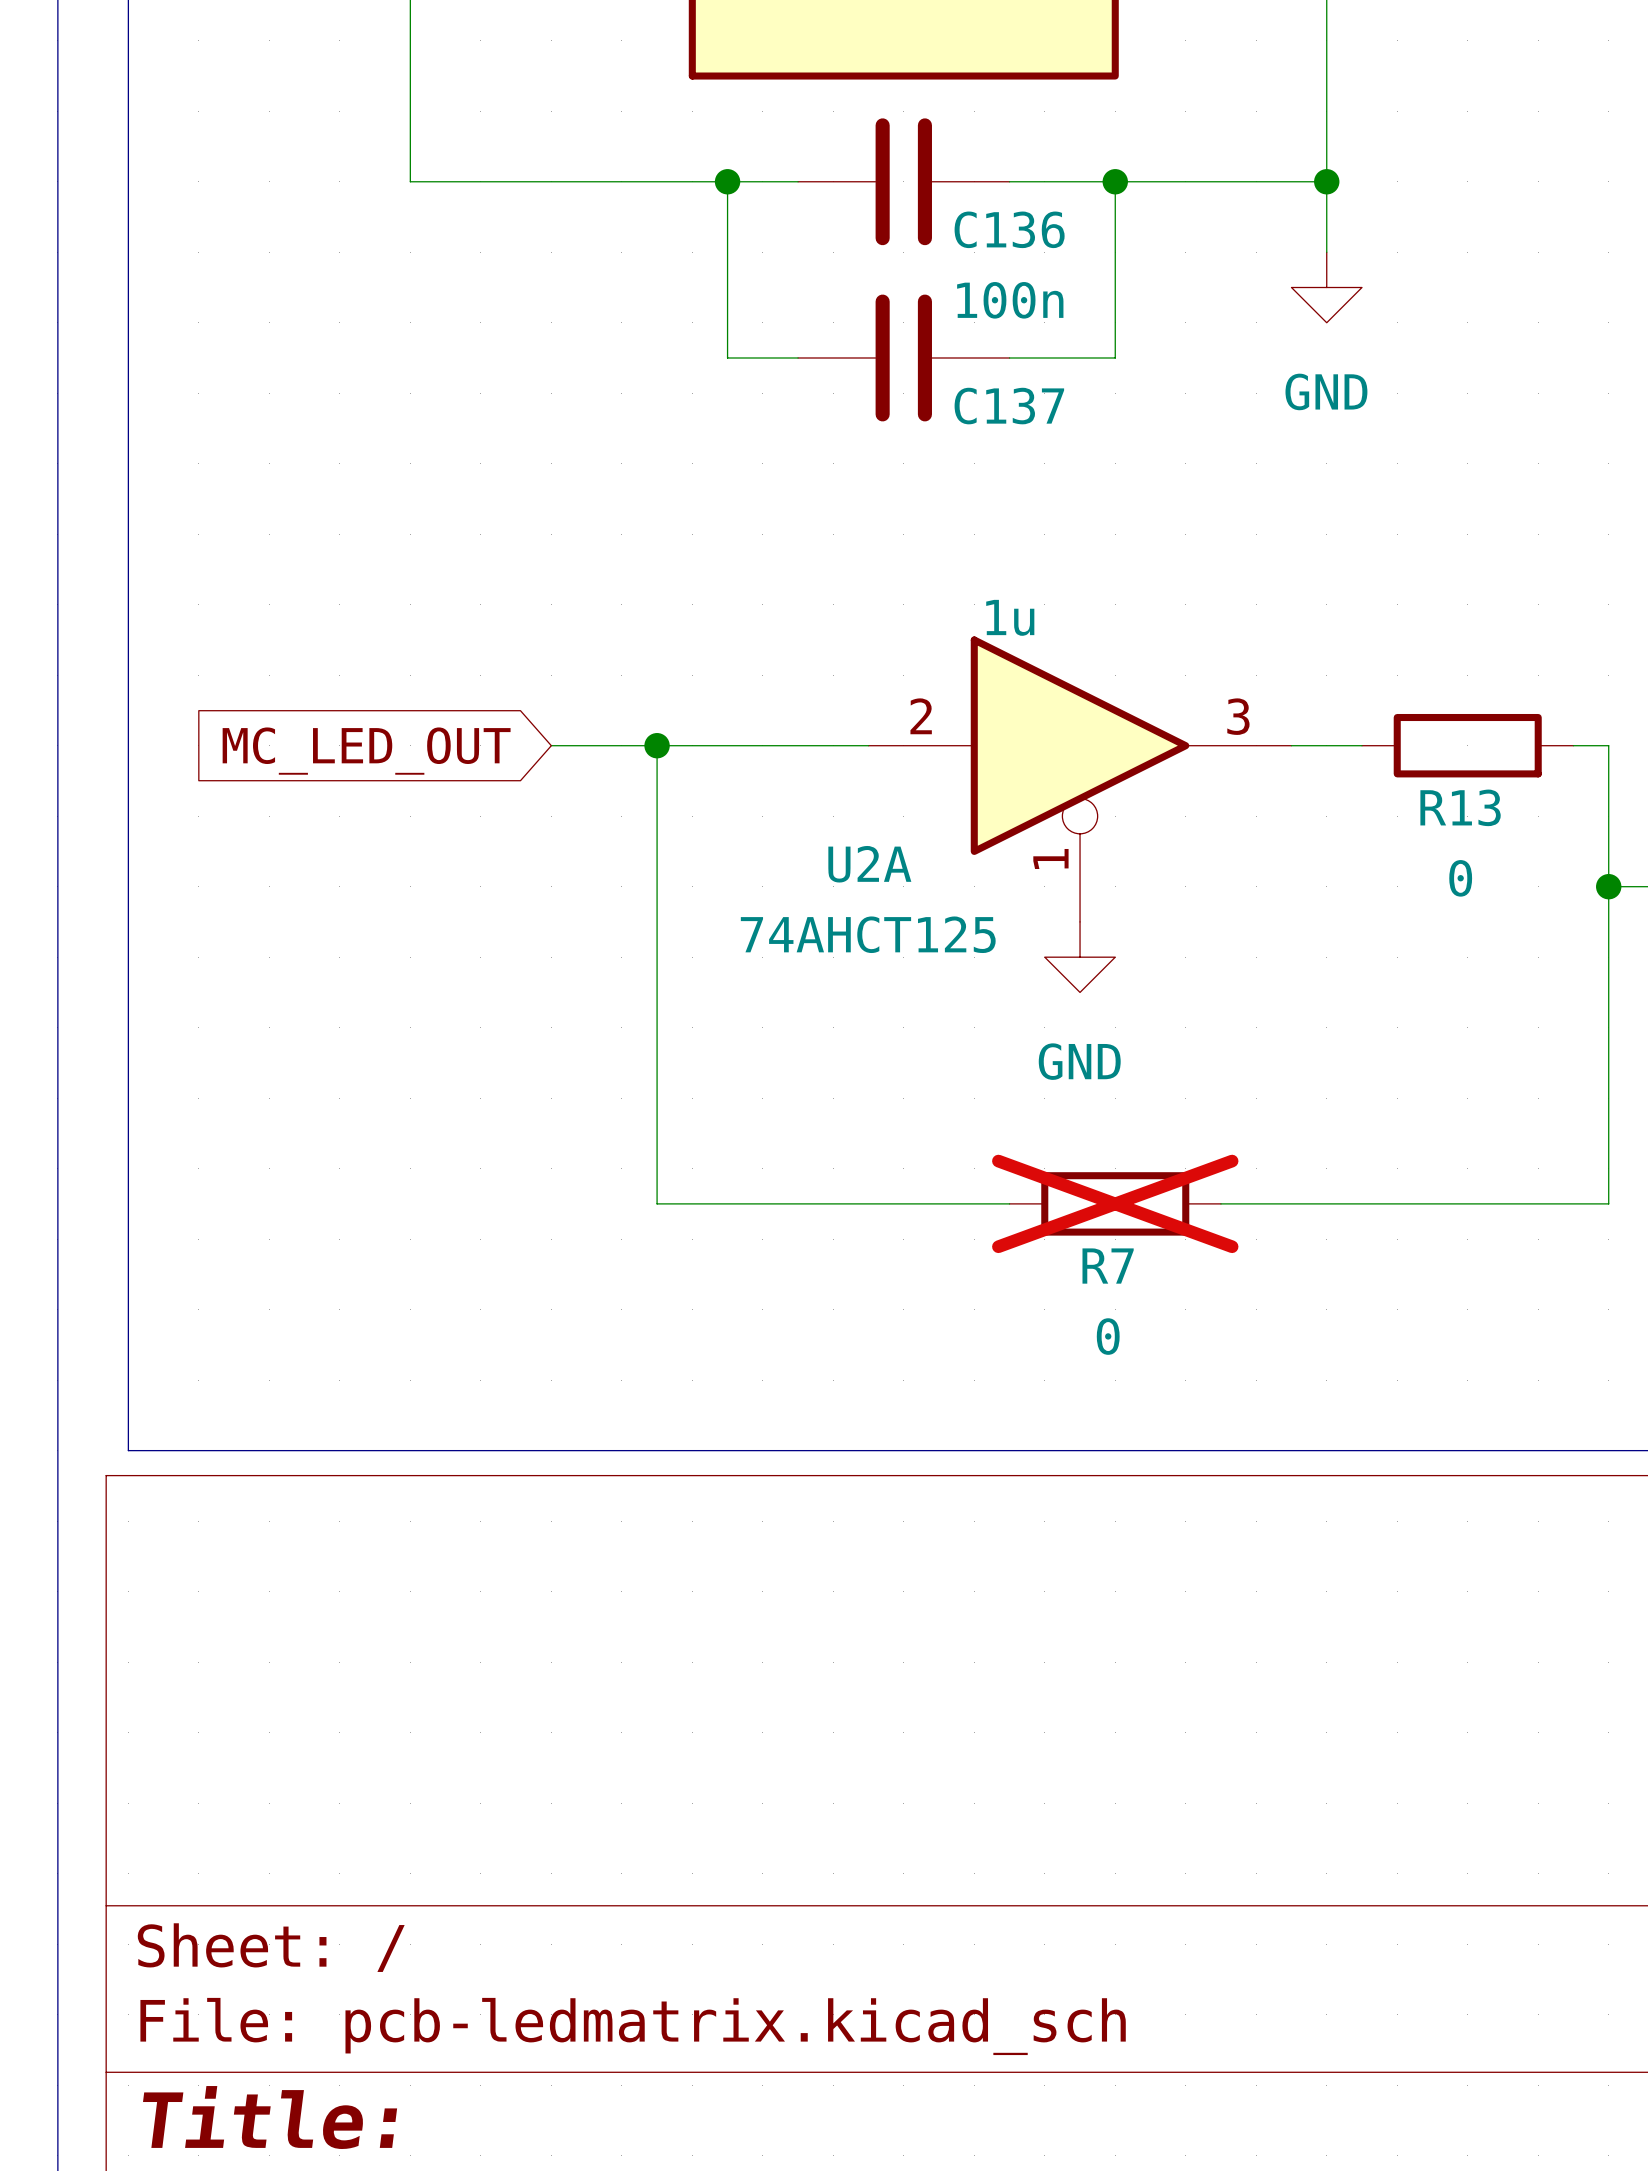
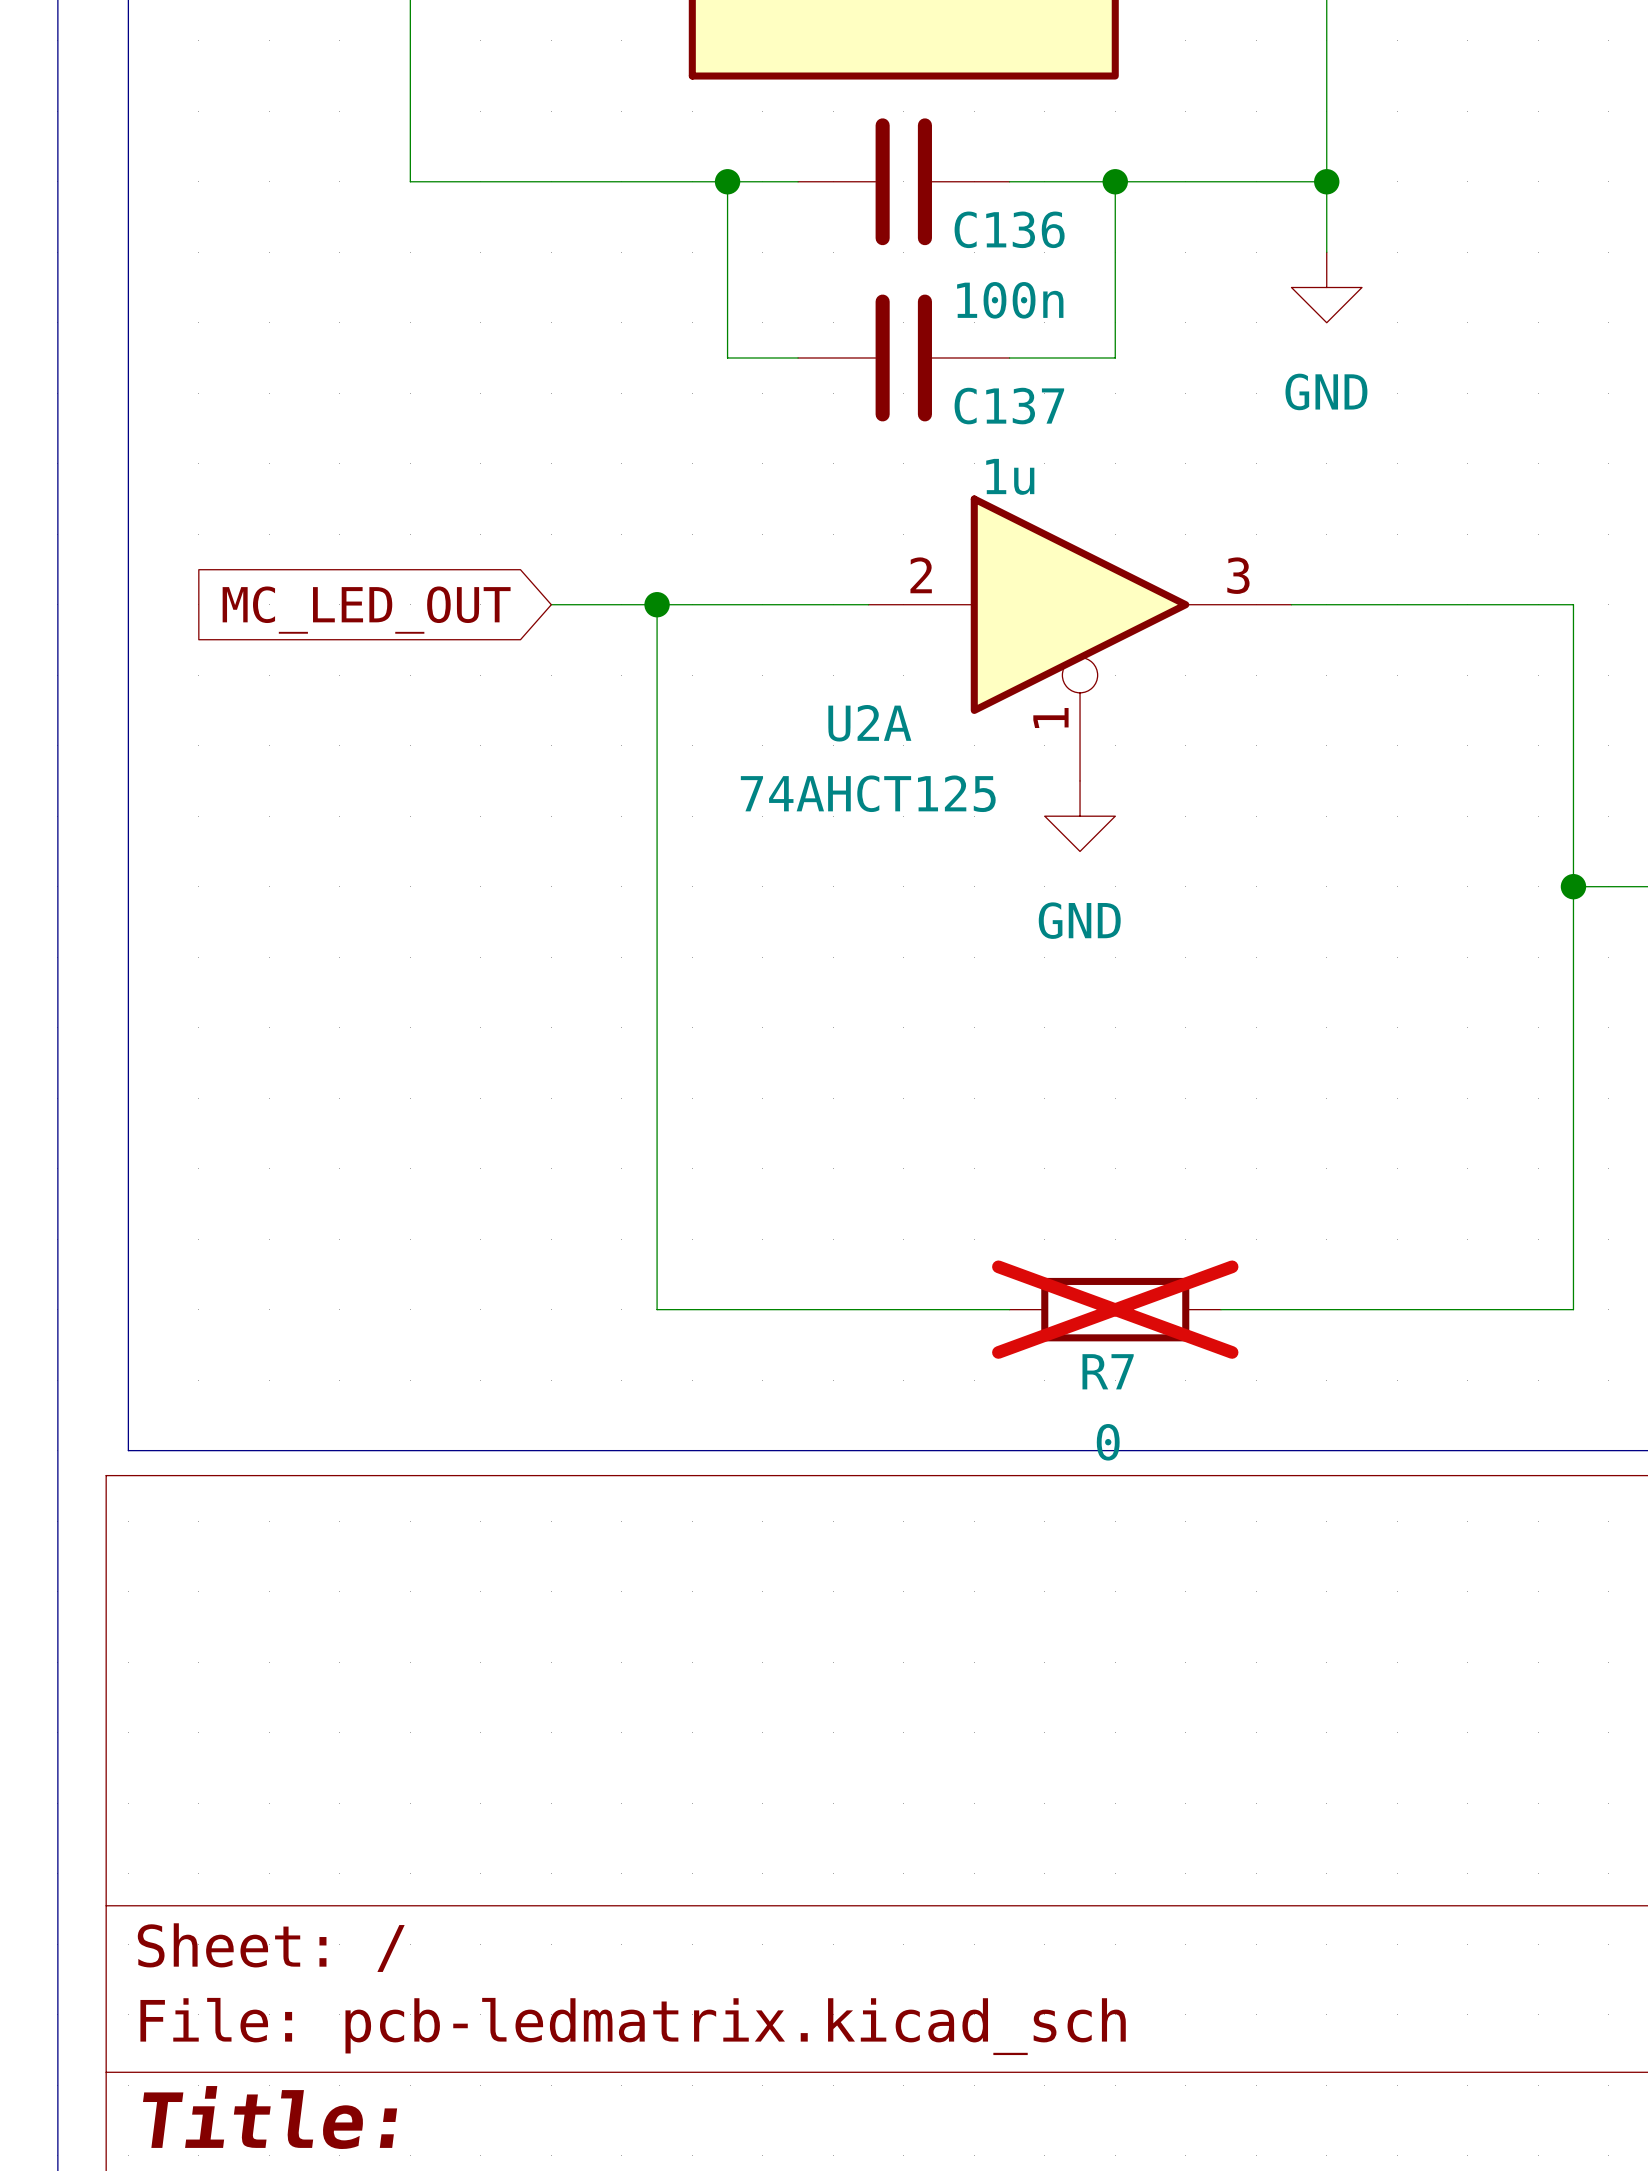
wire: none -> (657, 604) (657, 745)
wire: none -> (1291, 604) (1573, 604) (1573, 1309) (1221, 1309)
C137 value position: 1u (1010, 617) -> 1u (1010, 476)
wire: (551, 745) (868, 745) -> (551, 604) (868, 604)
junction position: (657, 745) -> (657, 604)
wire: (1291, 745) (1361, 745) -> none
R13: 0 (1467, 745) -> none
wire: (1573, 745) (1608, 745) (1608, 1203) (1221, 1203) -> none
global label position: MC_LED_OUT (366, 751) -> MC_LED_OUT (366, 610)
U2A position: (1080, 779) -> (1080, 638)
wire: none -> (1573, 886) (1608, 886)
junction position: (1608, 886) -> (1573, 886)
power symbol position: GND (1080, 957) -> GND (1080, 816)
wire: (657, 1203) (1009, 1203) -> (657, 1203) (657, 1309) (1009, 1309)
R7 position: (1115, 1203) -> (1115, 1309)

